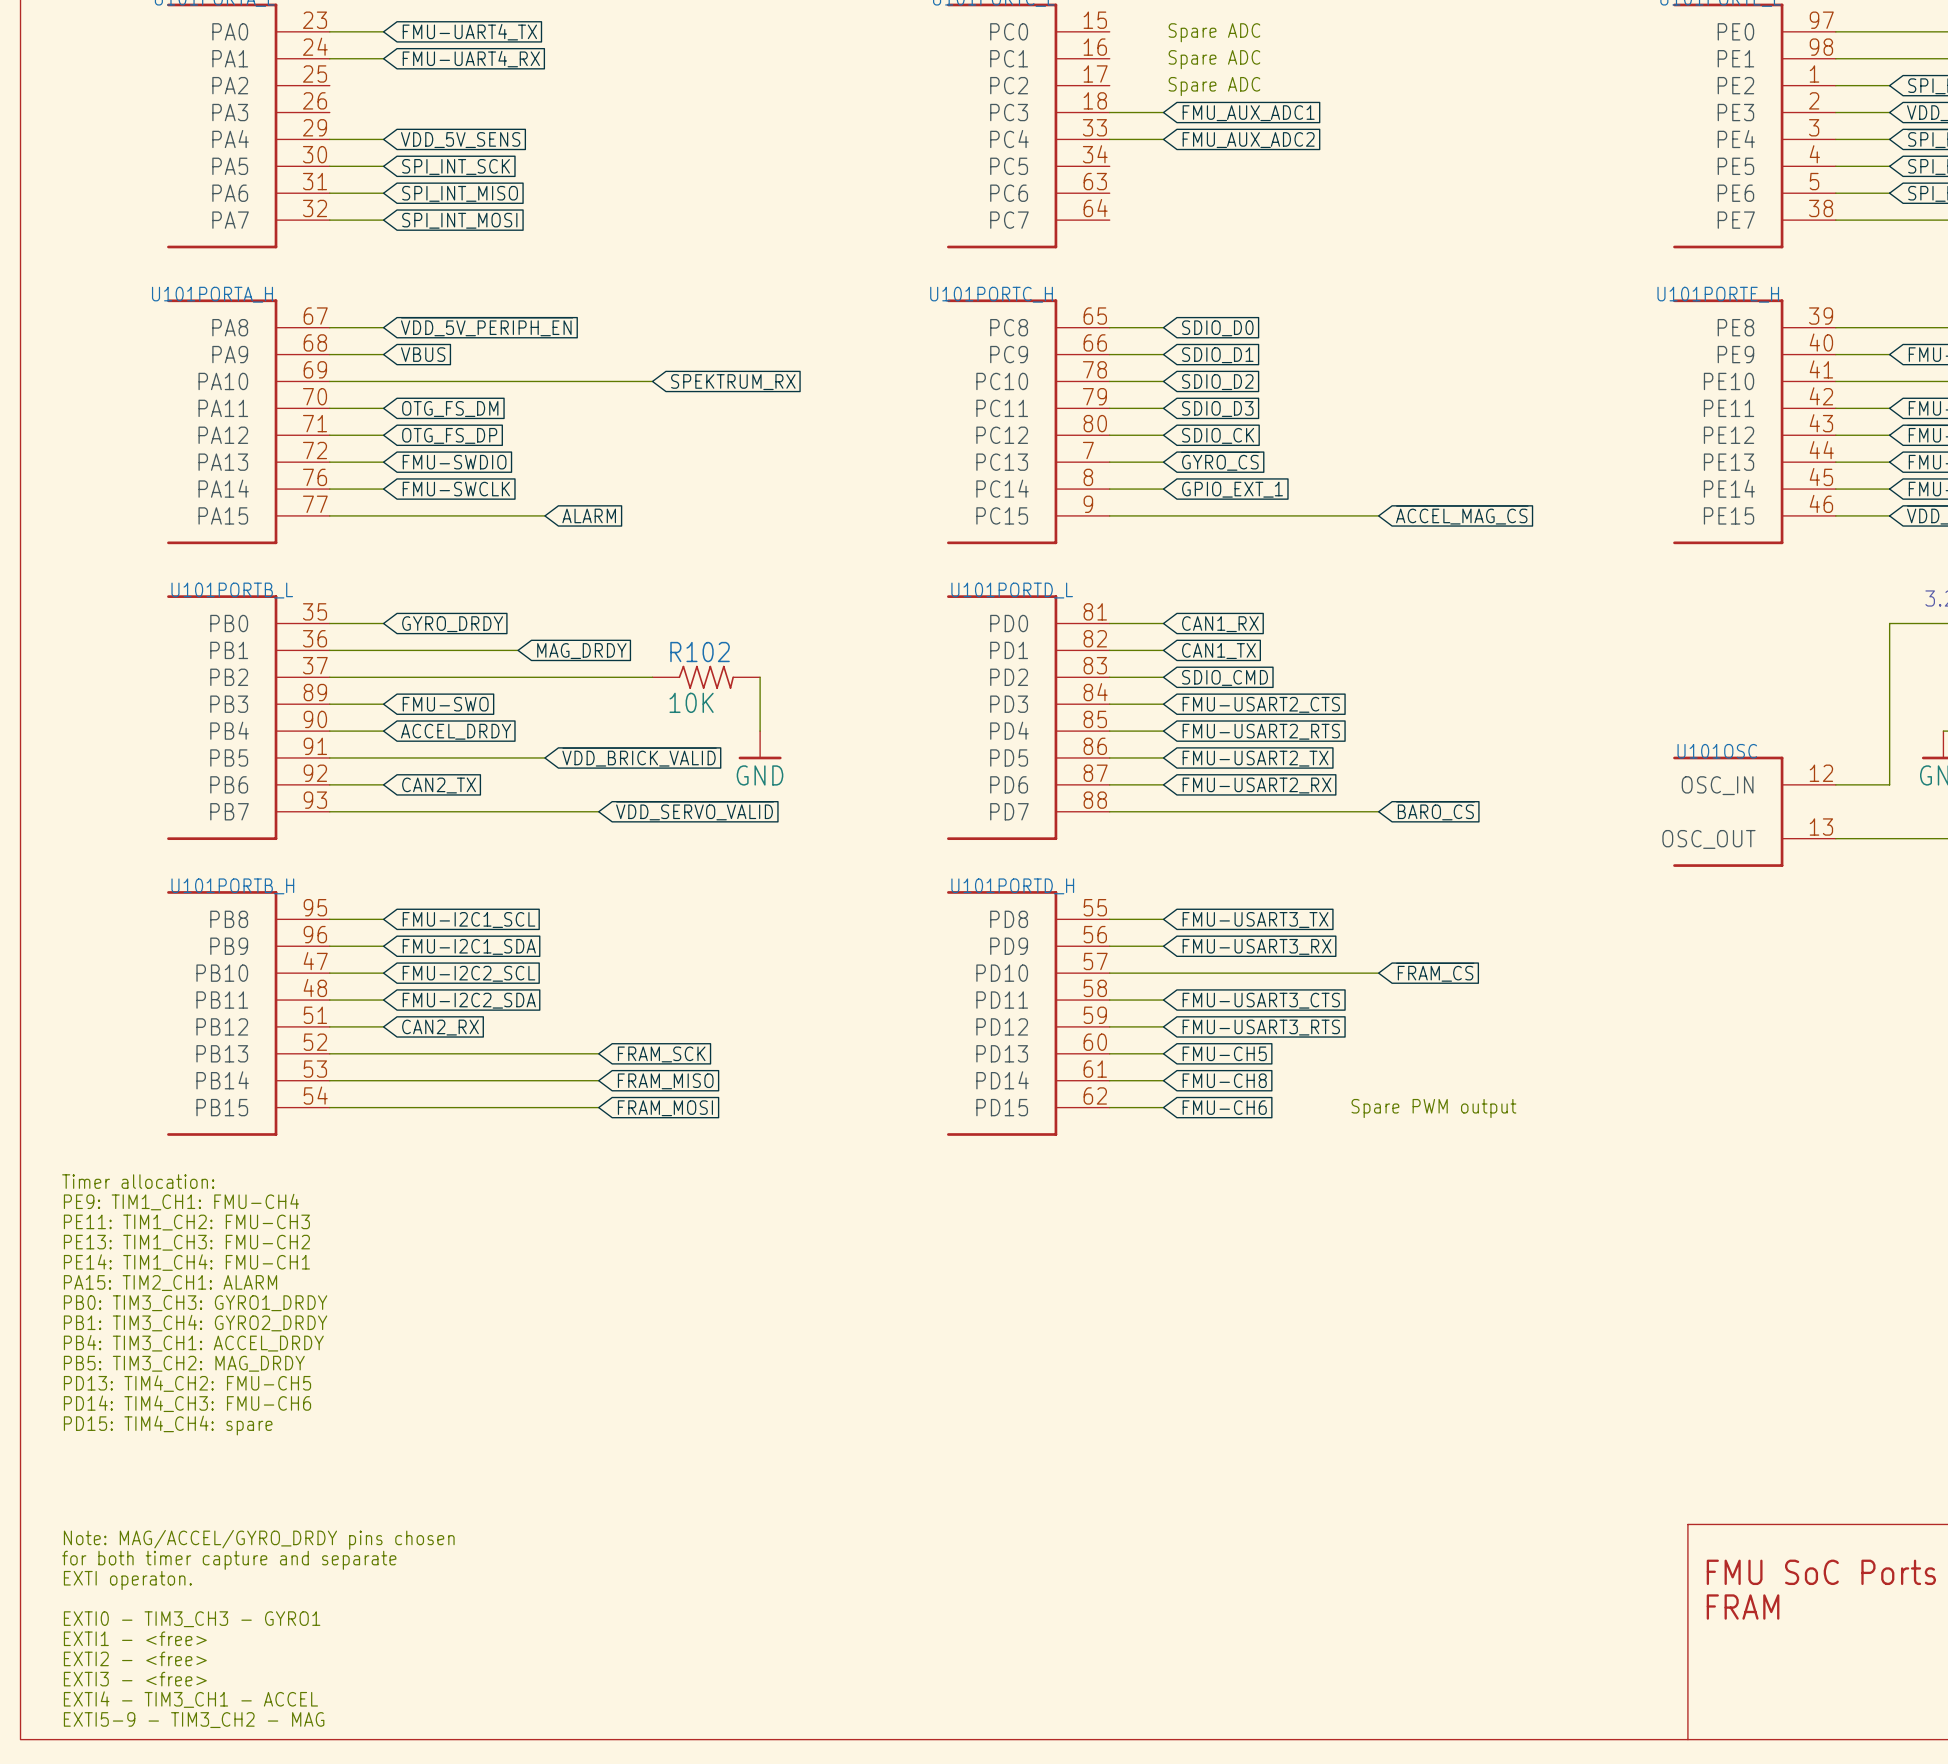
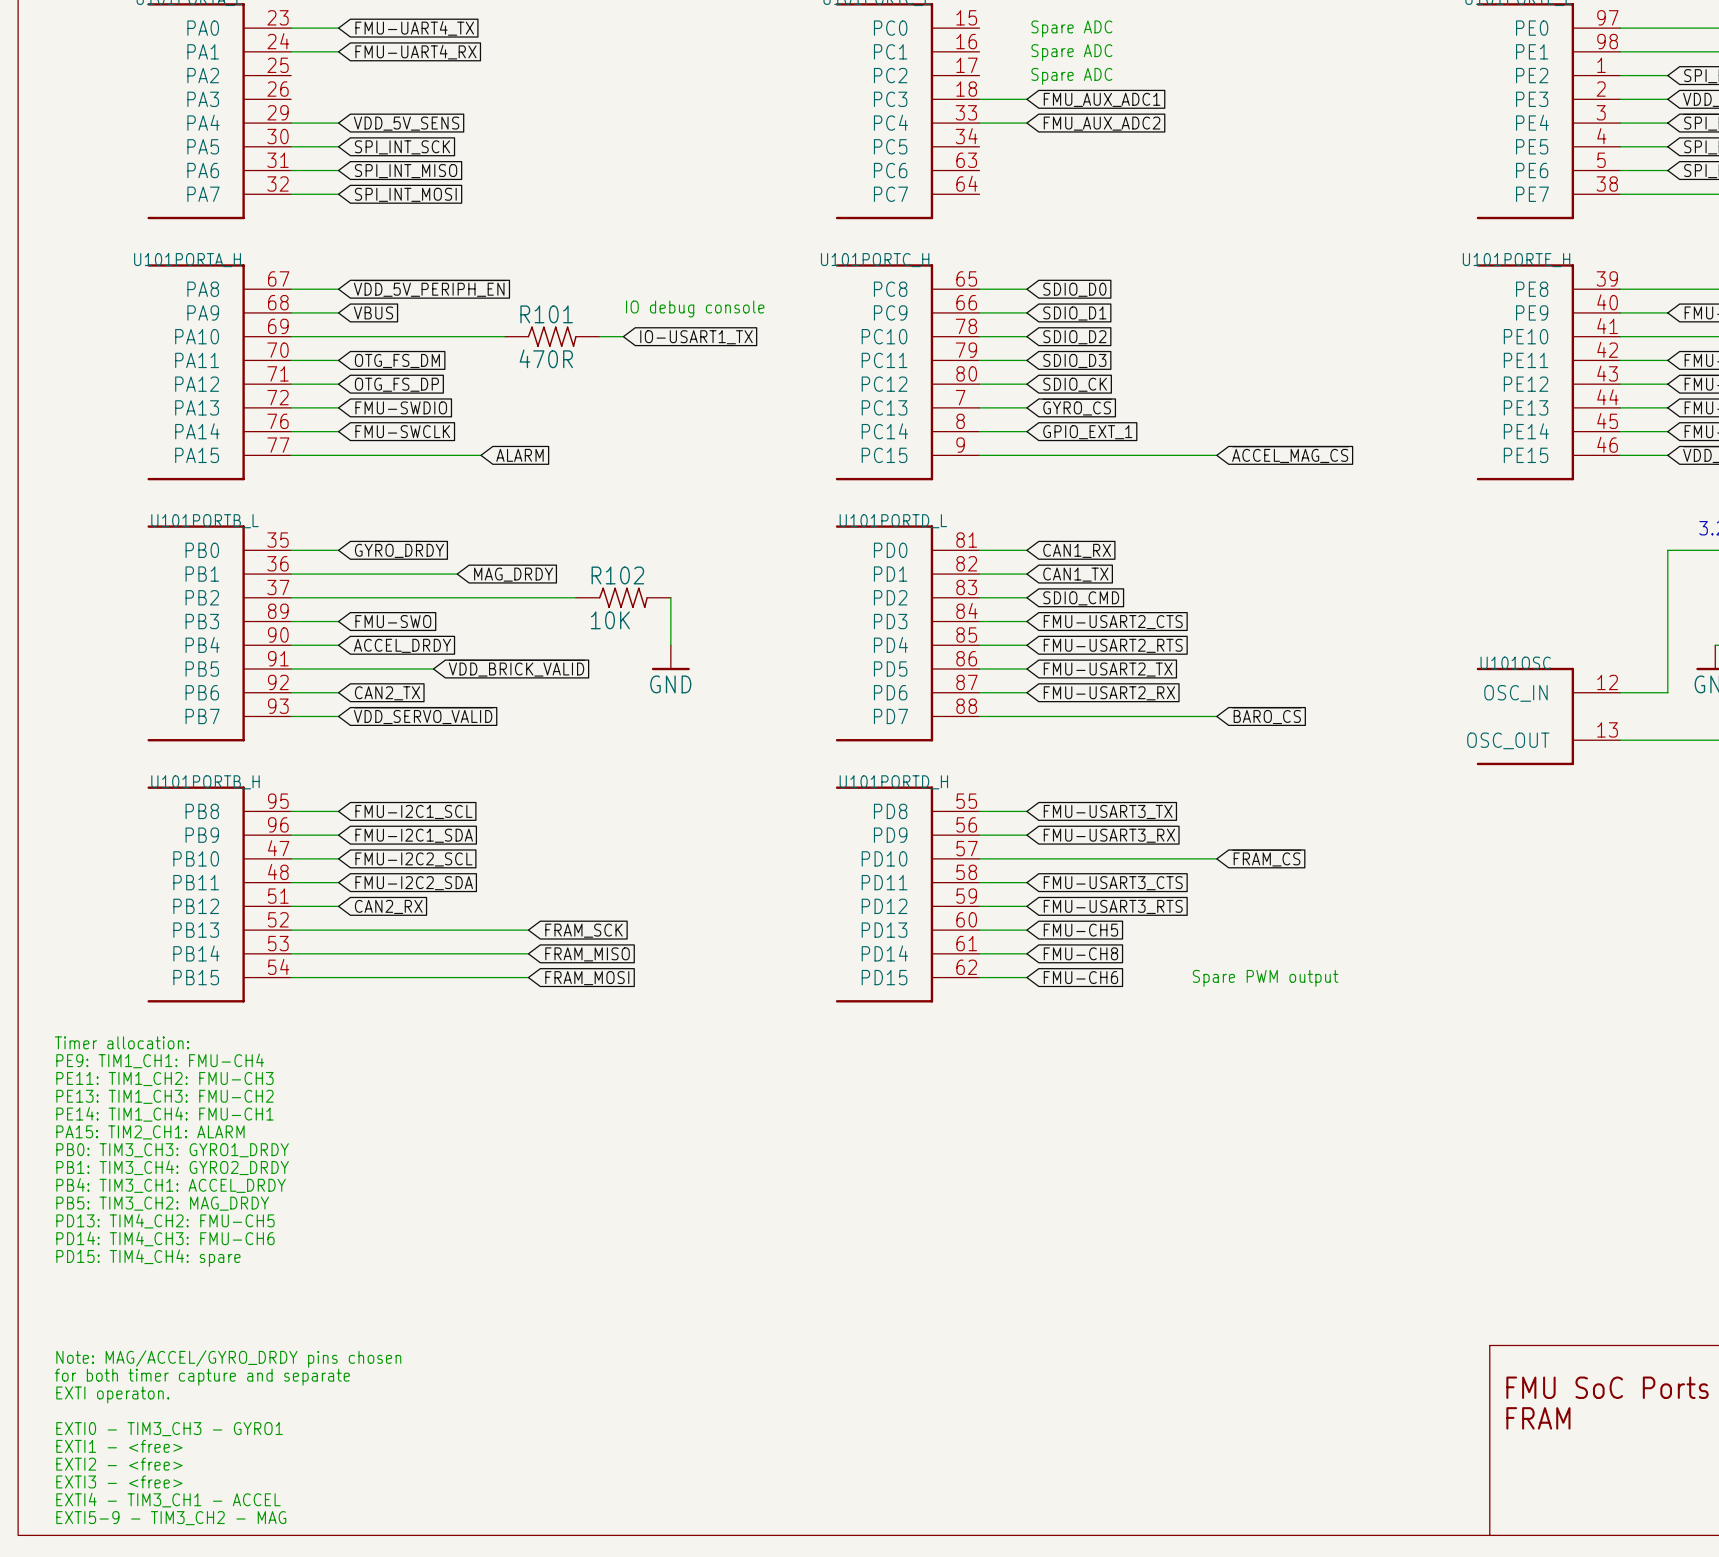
text: none -> IO debug console (695, 308)
R101: none -> 470R (552, 336)
global label: SPEKTRUM_RX (733, 382) -> none
global label: none -> IO-USART1_TX (696, 337)
wire: (491, 757) (544, 757) -> none
global label position: ~{VDD_BRICK_VALID} (639, 757) -> ~{VDD_BRICK_VALID} (517, 668)
global label position: ~{VDD_SERVO_VALID} (695, 810) -> ~{VDD_SERVO_VALID} (423, 715)
wire: (383, 811) (598, 811) -> none

